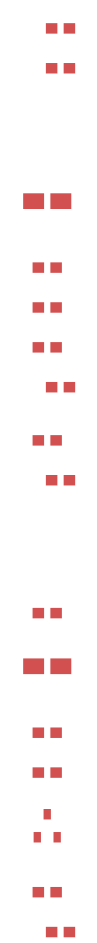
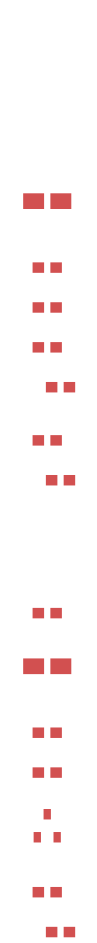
part: (60, 28) -> none
part: (60, 68) -> none

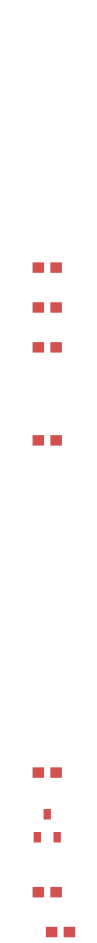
part: (47, 201) -> none
part: (60, 387) -> none
part: (60, 480) -> none
part: (47, 613) -> none
part: (47, 666) -> none
part: (47, 732) -> none

